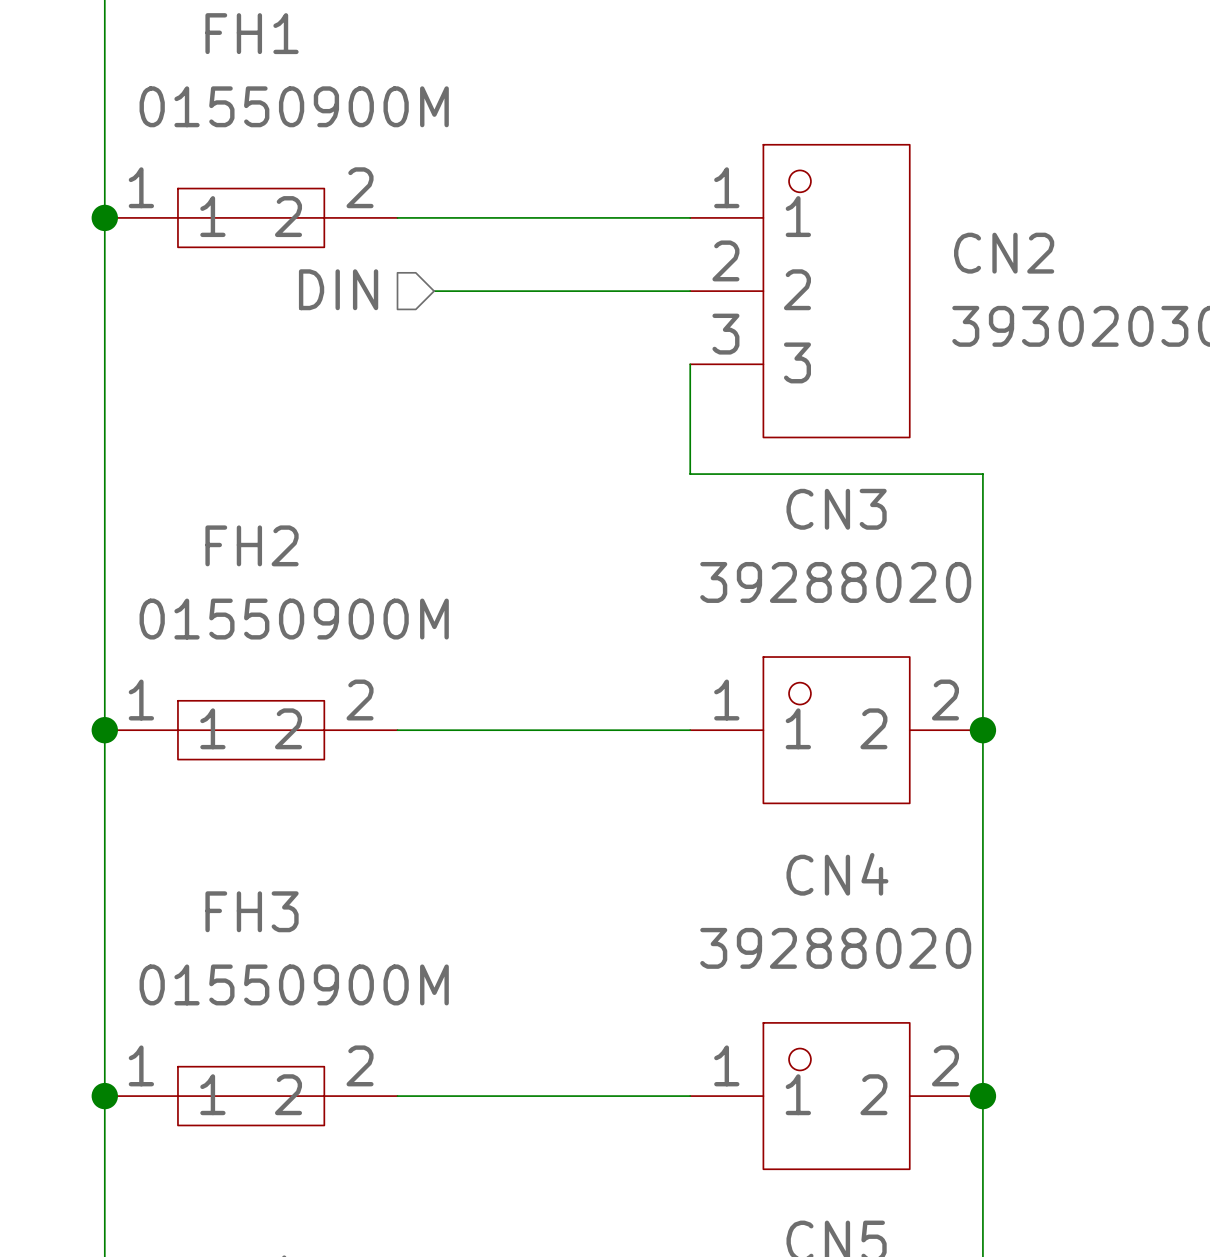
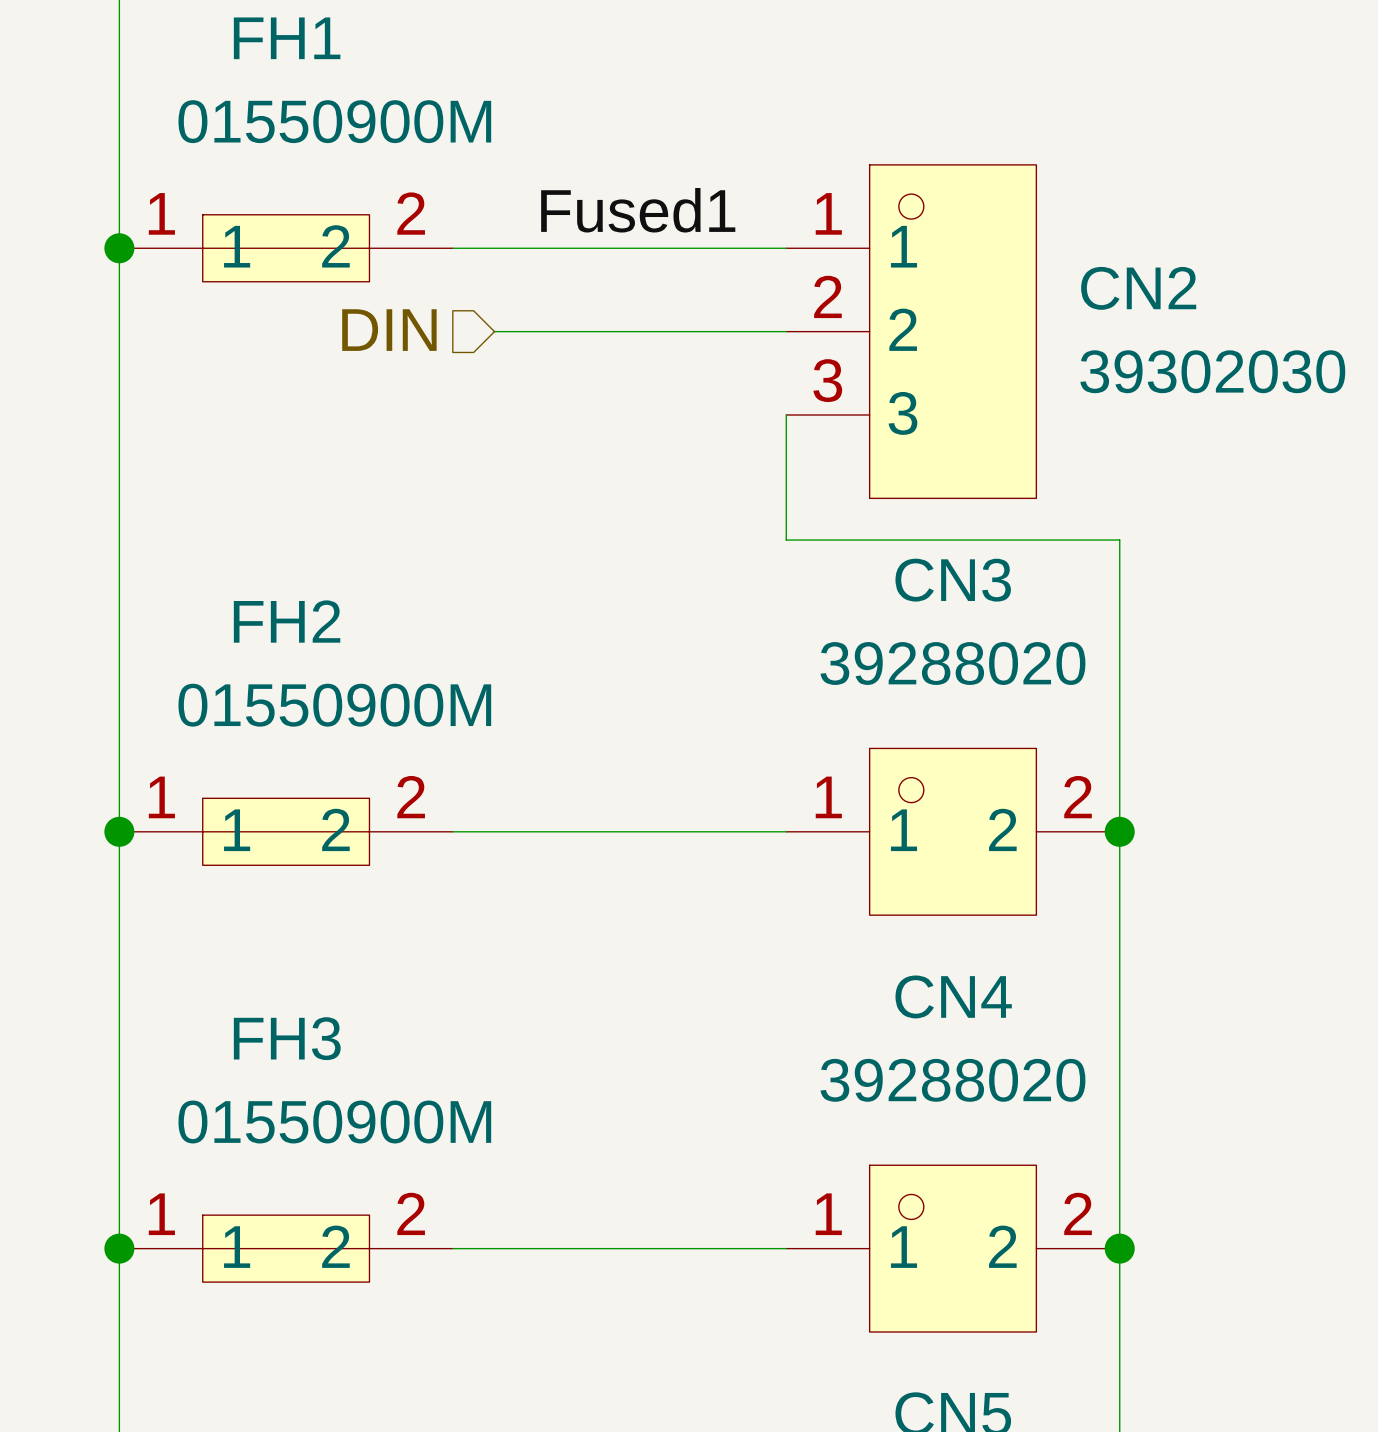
label: none -> Fused1 (638, 210)

